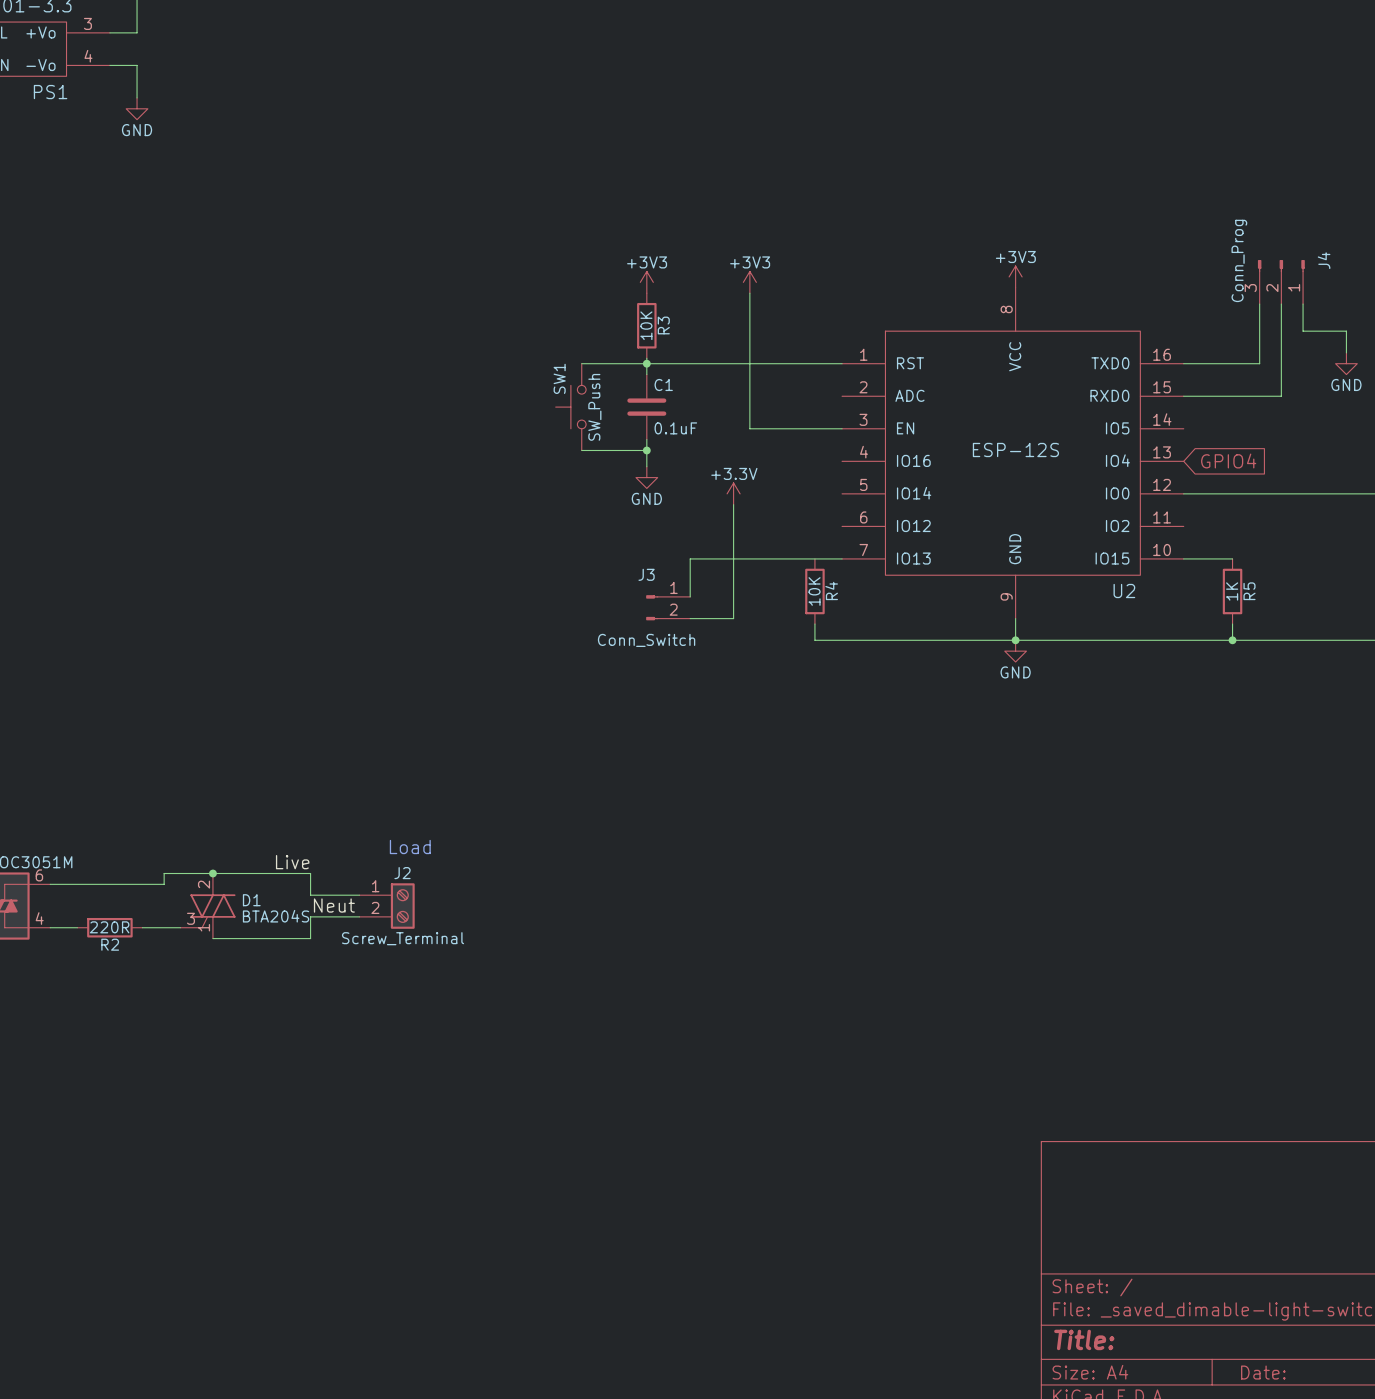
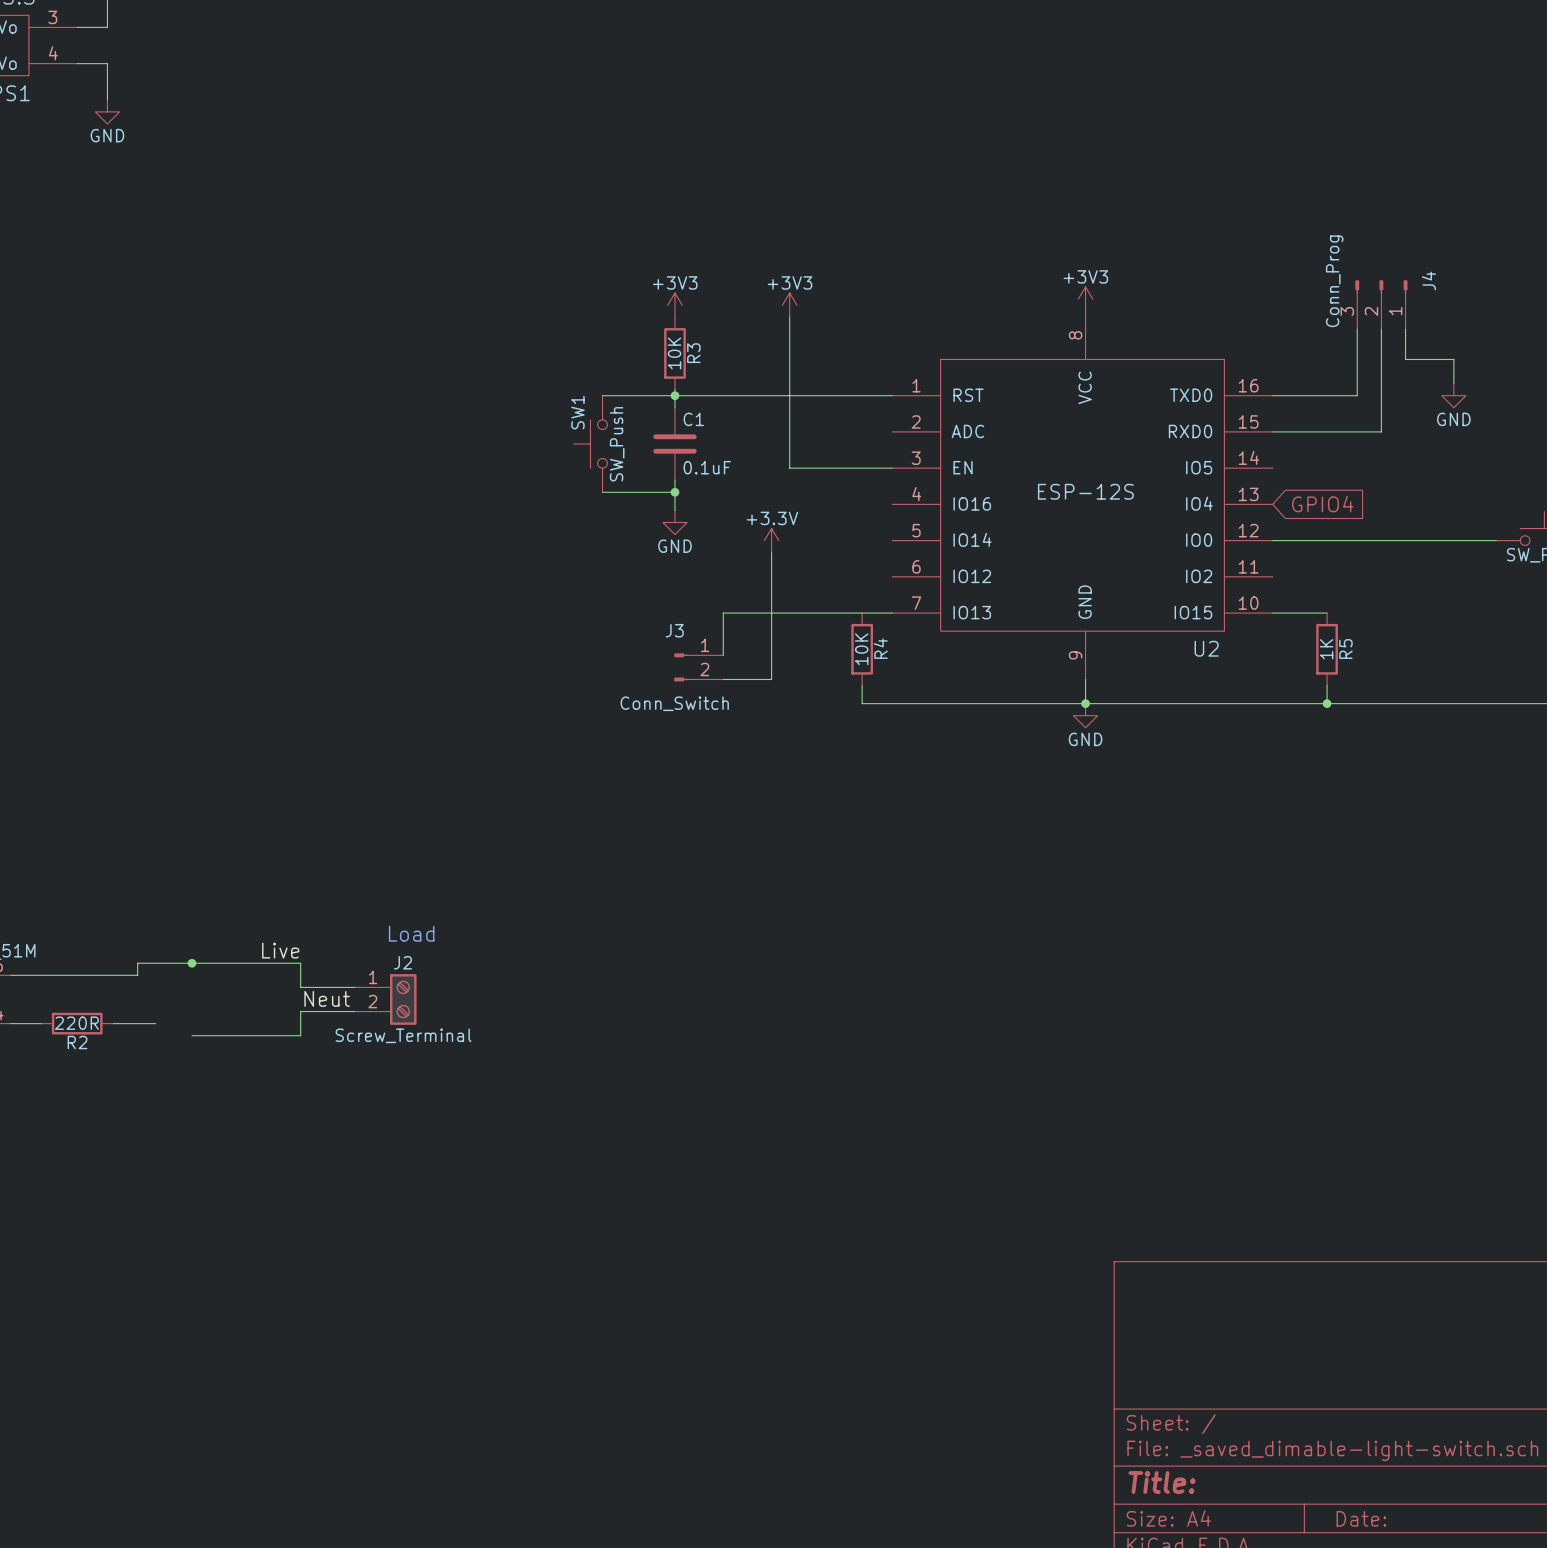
D1: BTA204S (207, 906) -> none

